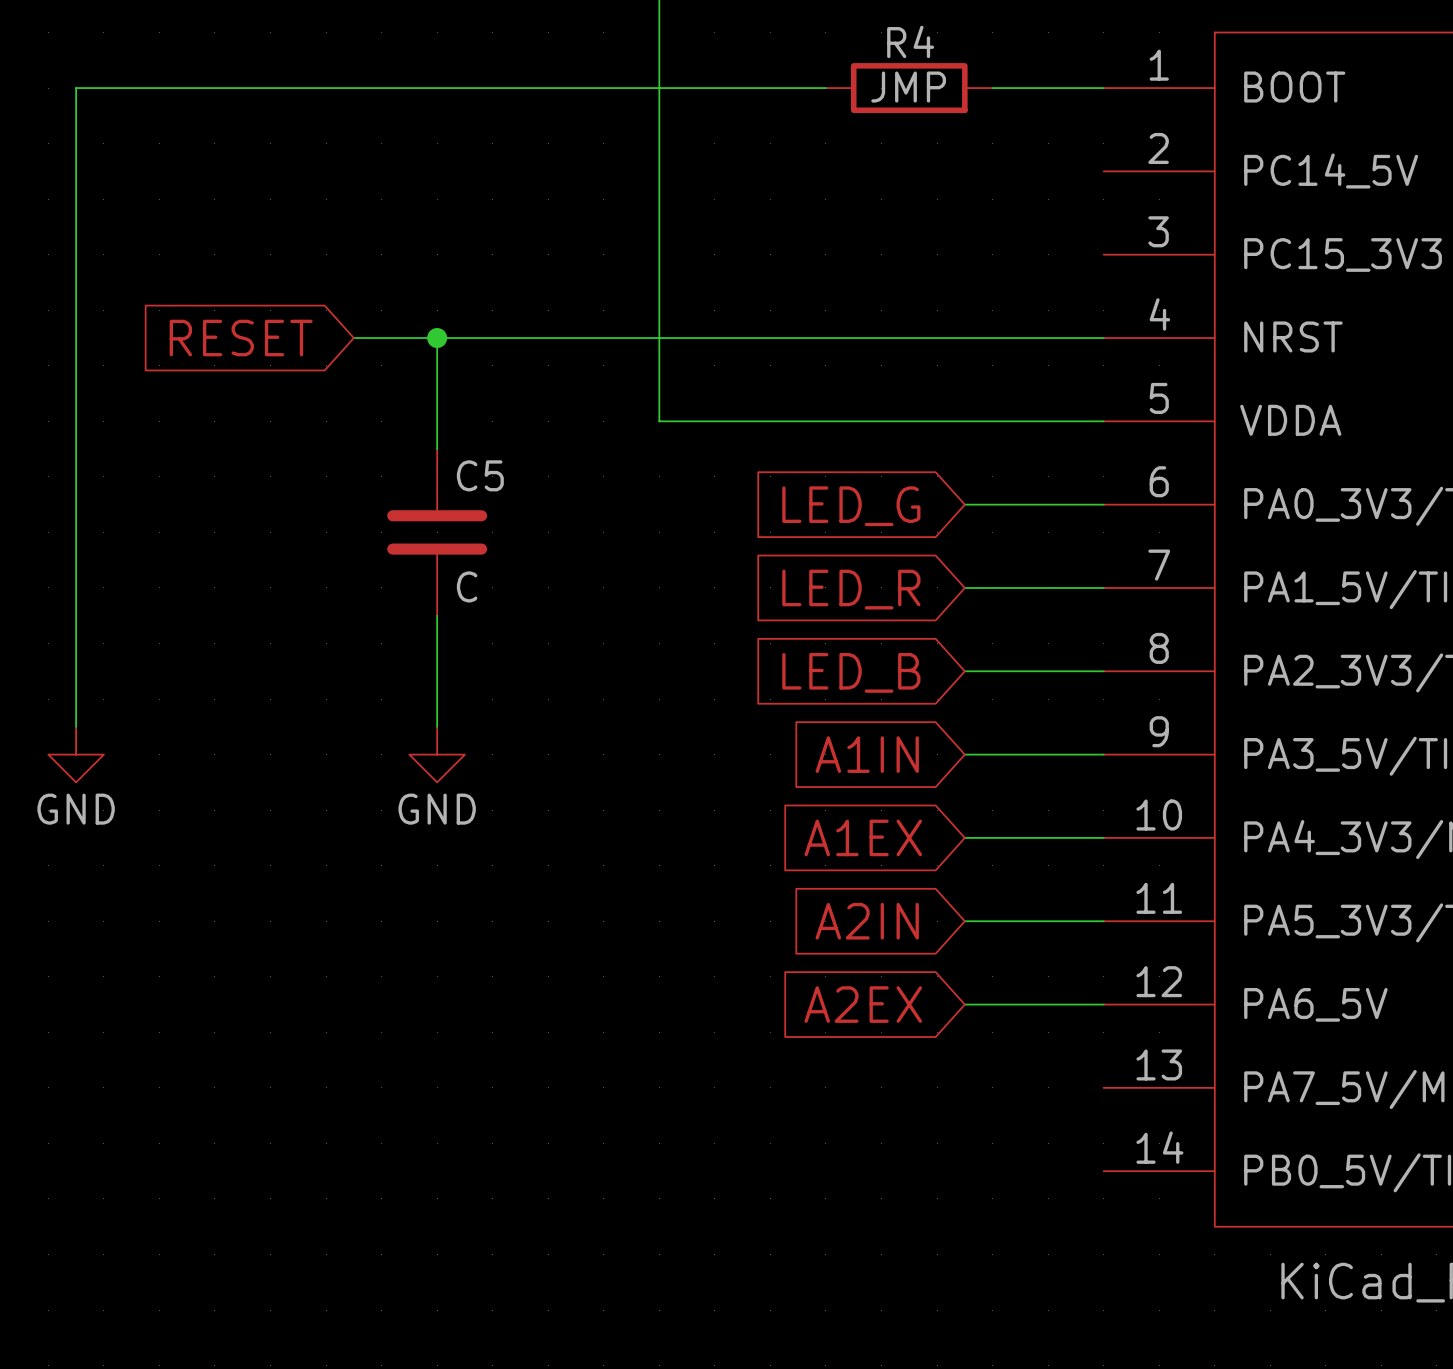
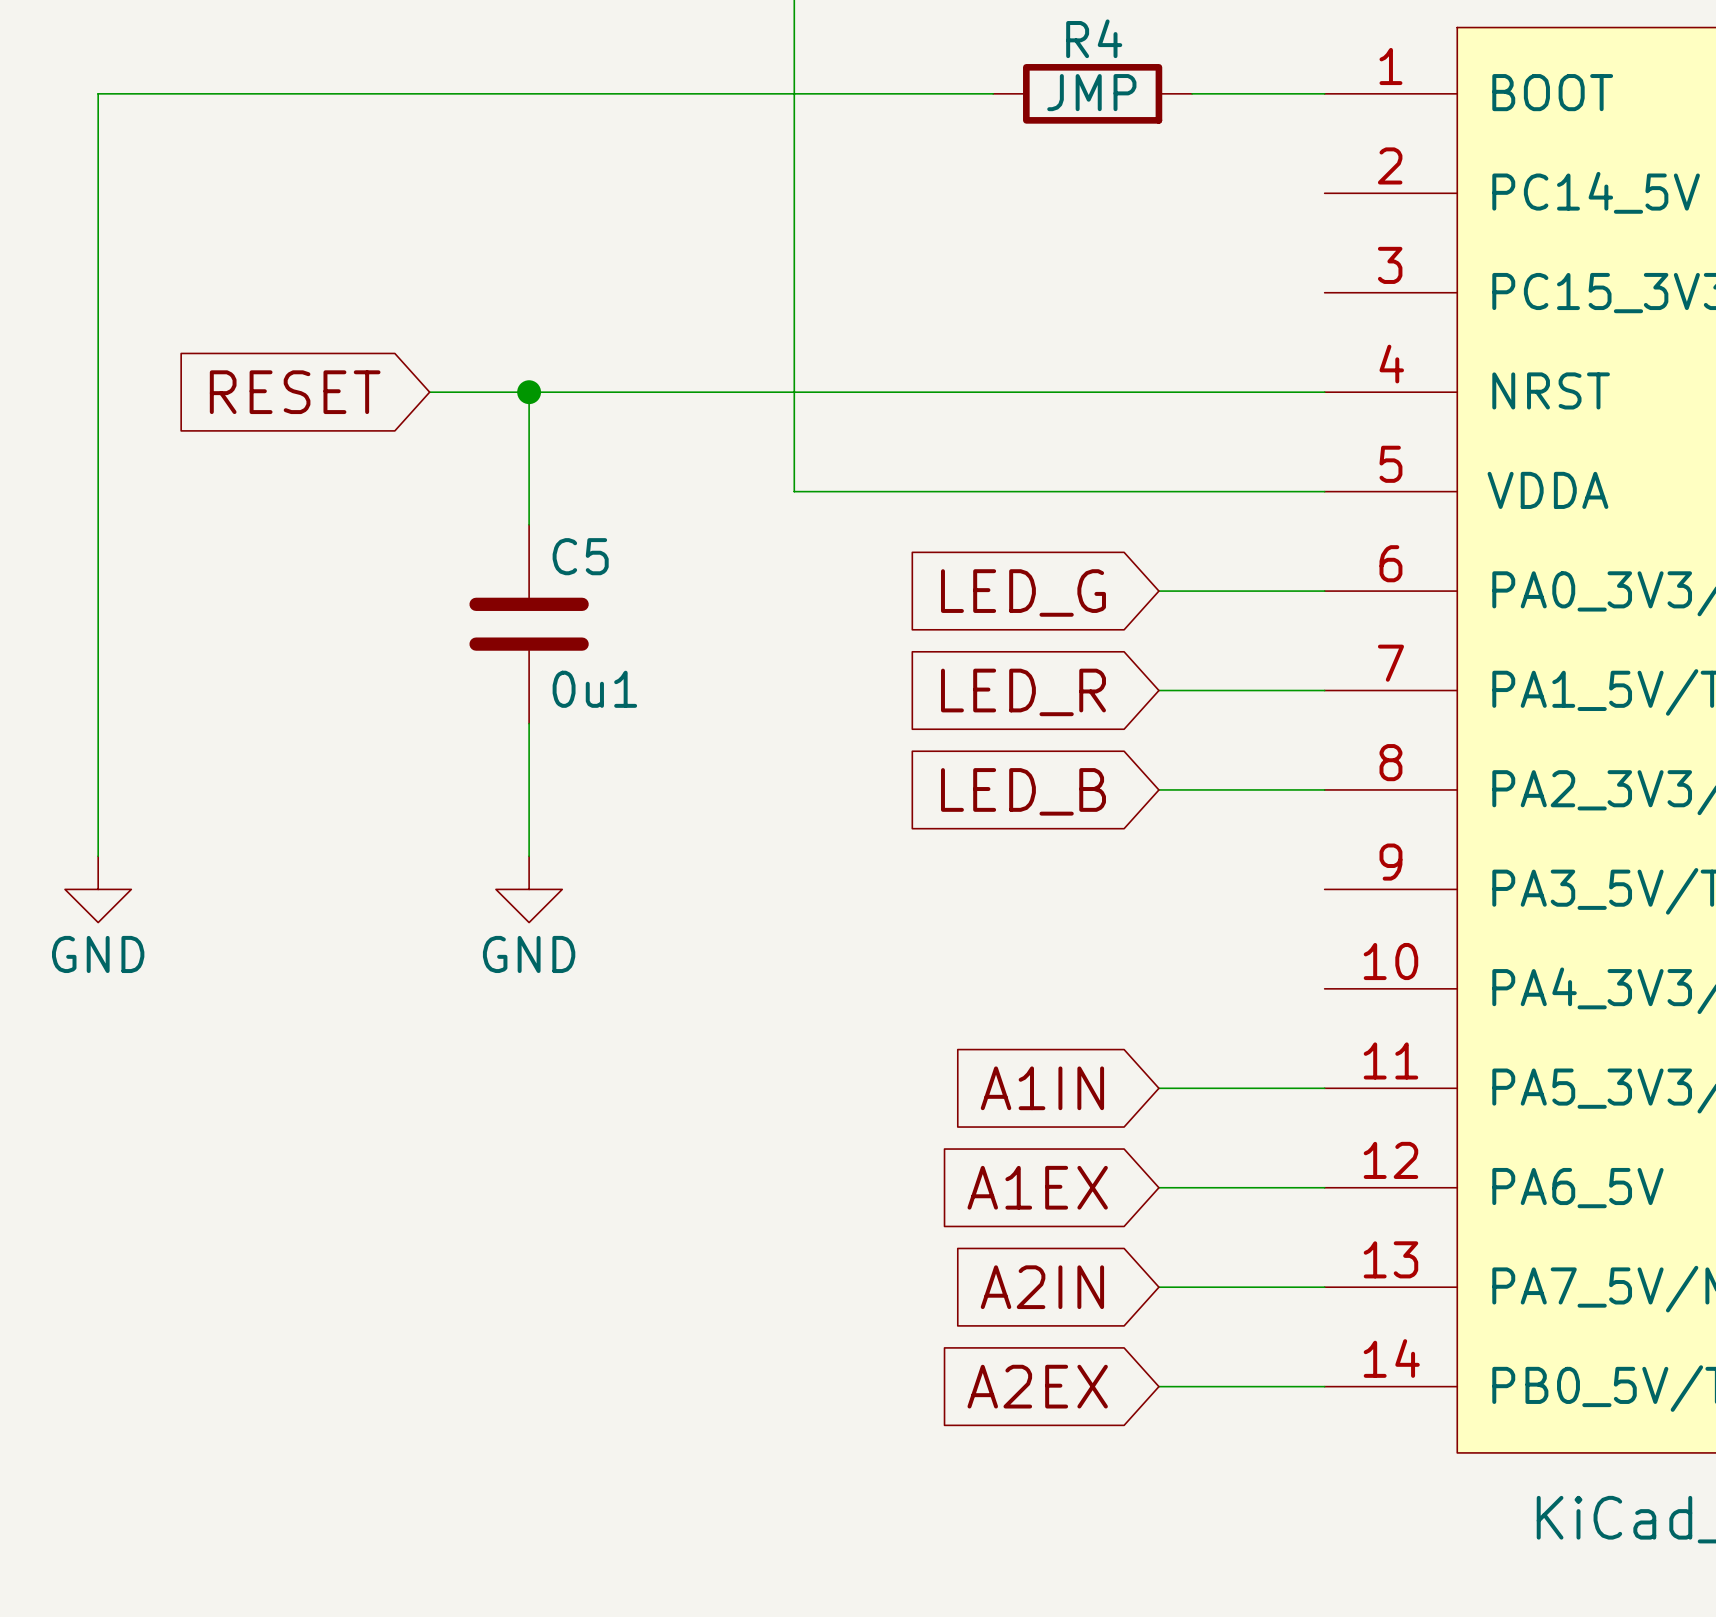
C5 value: C (467, 586) -> 0u1 (594, 689)
global label: A1IN (867, 754) -> none
wire: (964, 754) (1103, 754) -> (1158, 1386) (1324, 1386)
global label: A1EX (863, 837) -> none
wire: (964, 837) (1103, 837) -> (1158, 1287) (1324, 1287)
global label: A2IN (867, 921) -> A1IN (1042, 1088)
global label: A2EX (863, 1004) -> A1EX (1037, 1187)
global label: none -> A2IN (1042, 1287)
global label: none -> A2EX (1037, 1386)

